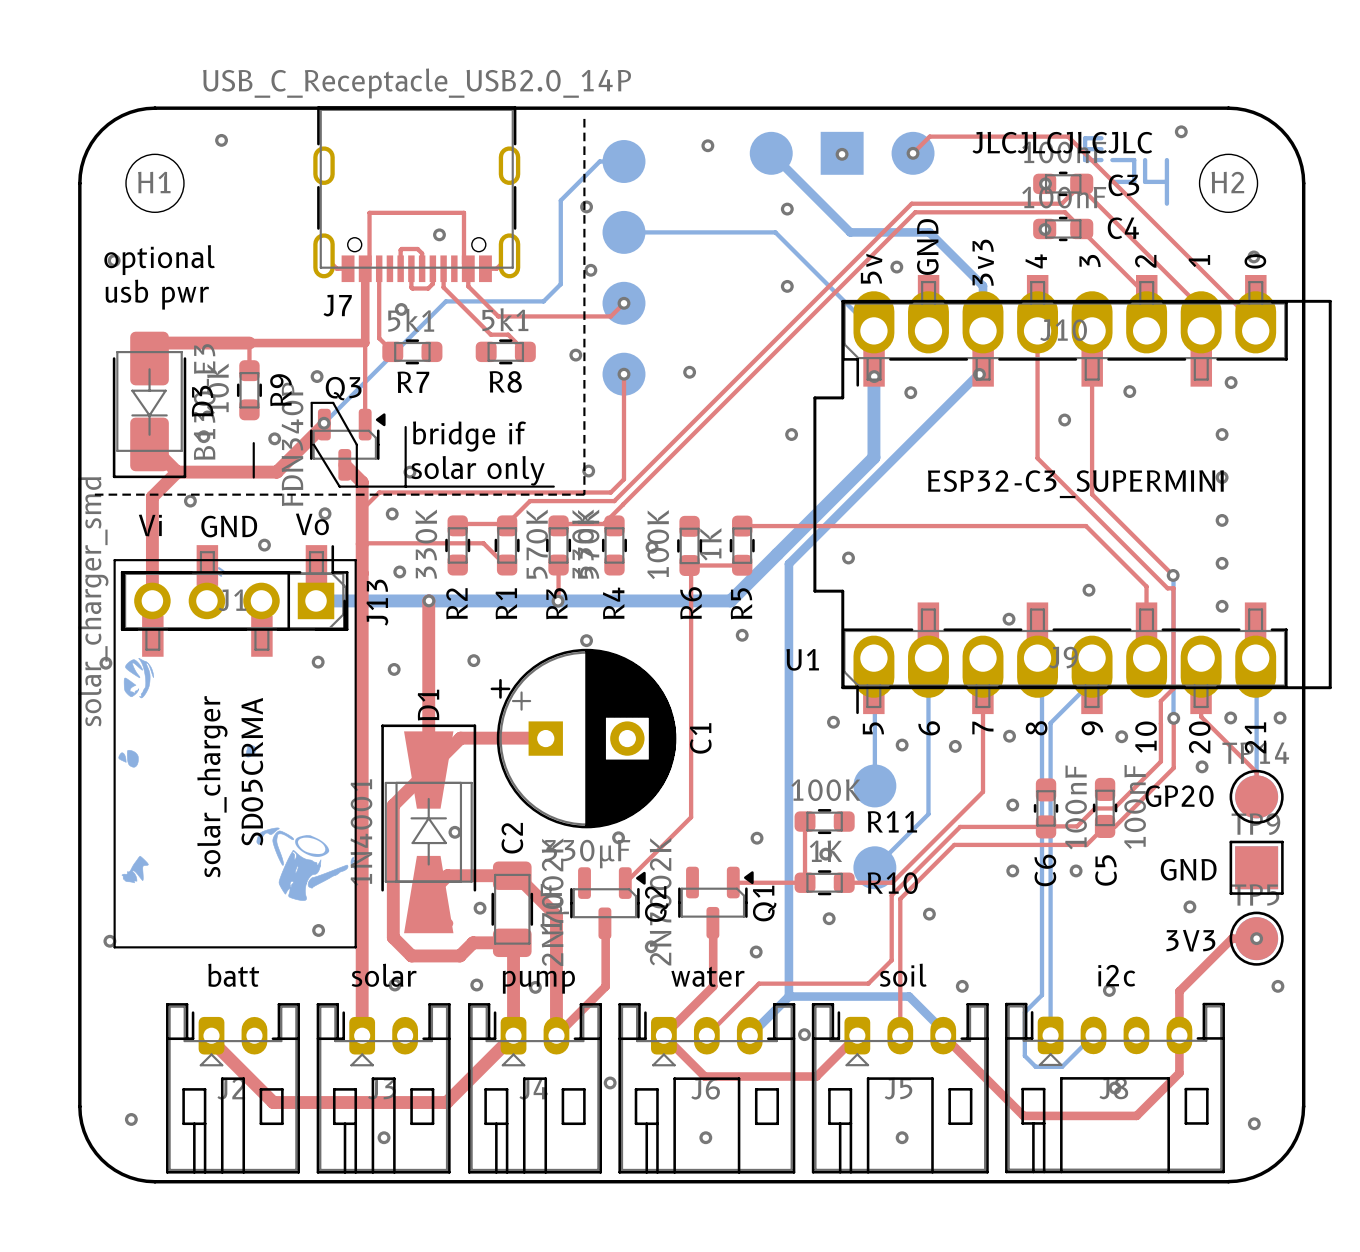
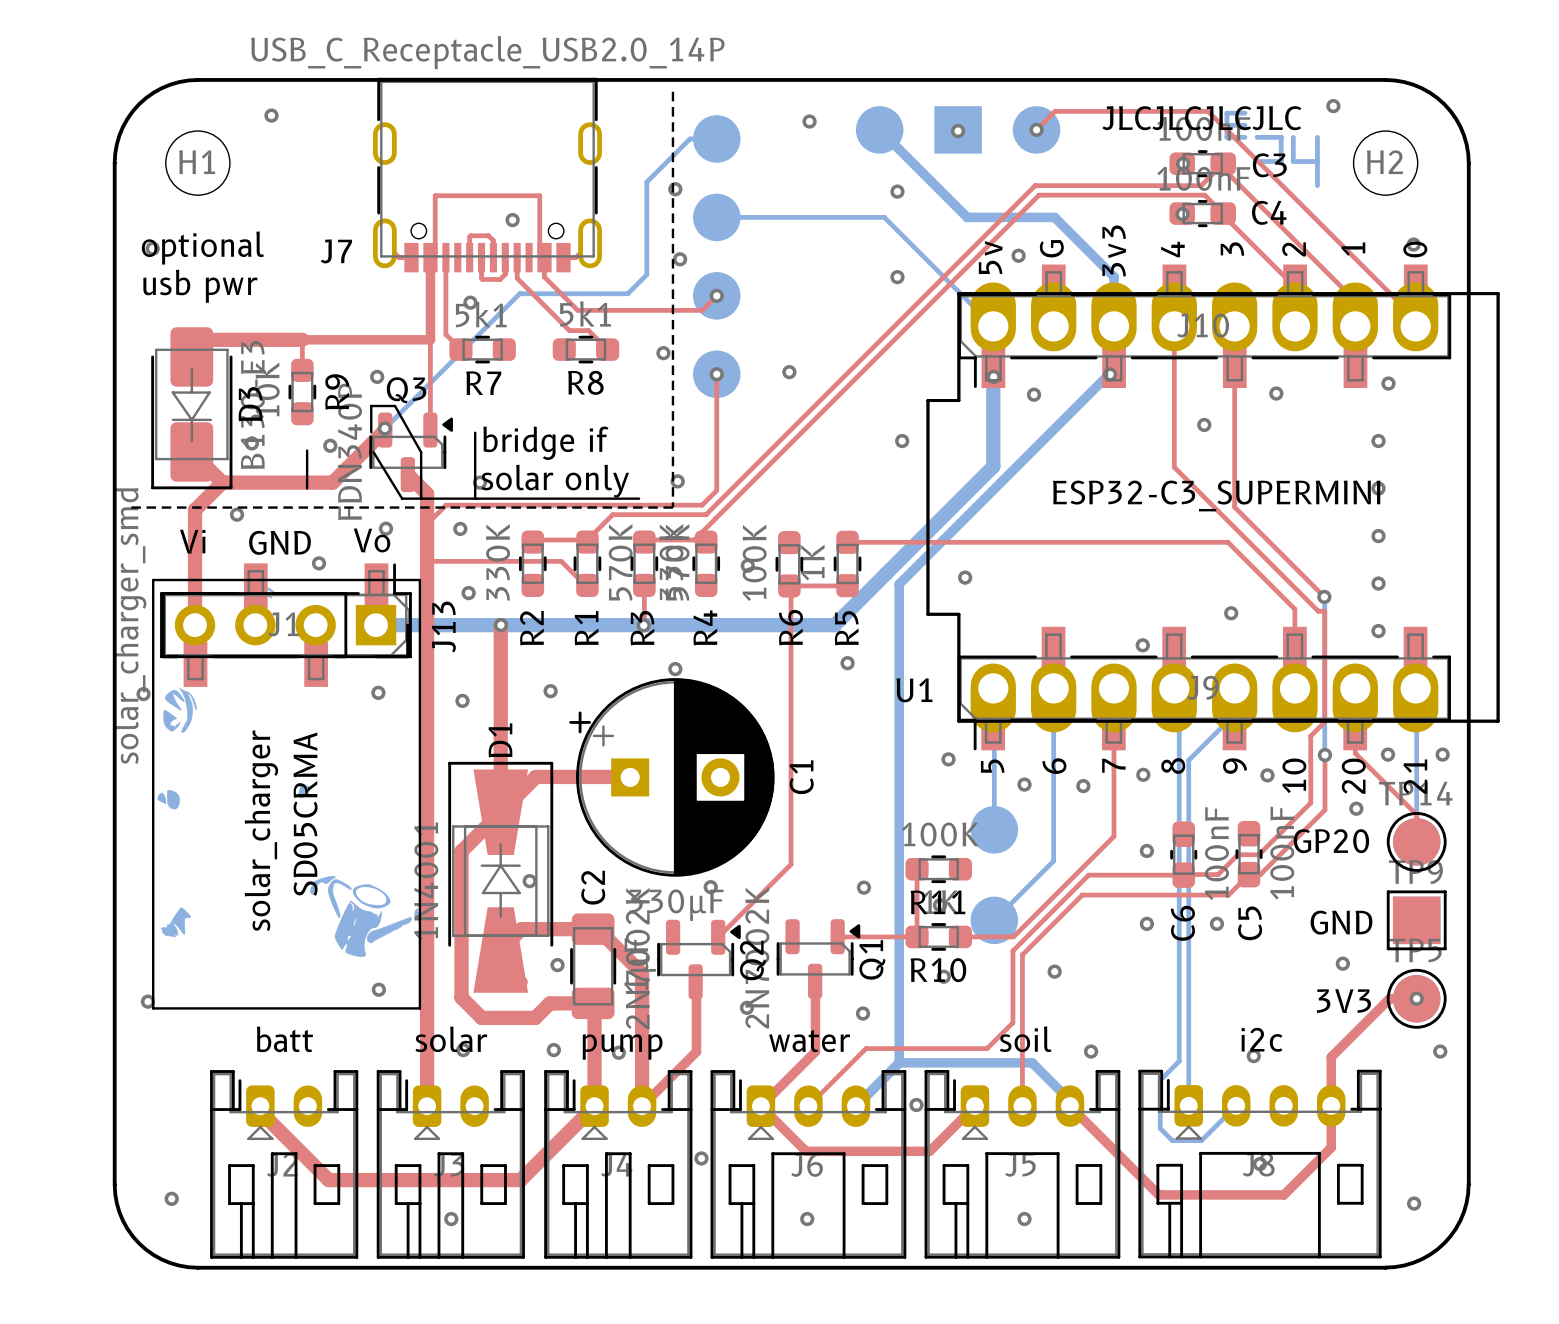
text: GND (927, 247) -> G (1051, 248)
J7 name position: J7 (337, 305) -> J7 (336, 251)
R11 name position: R11 (892, 821) -> R11 (937, 902)
R10 name position: R10 (892, 883) -> R10 (938, 970)

